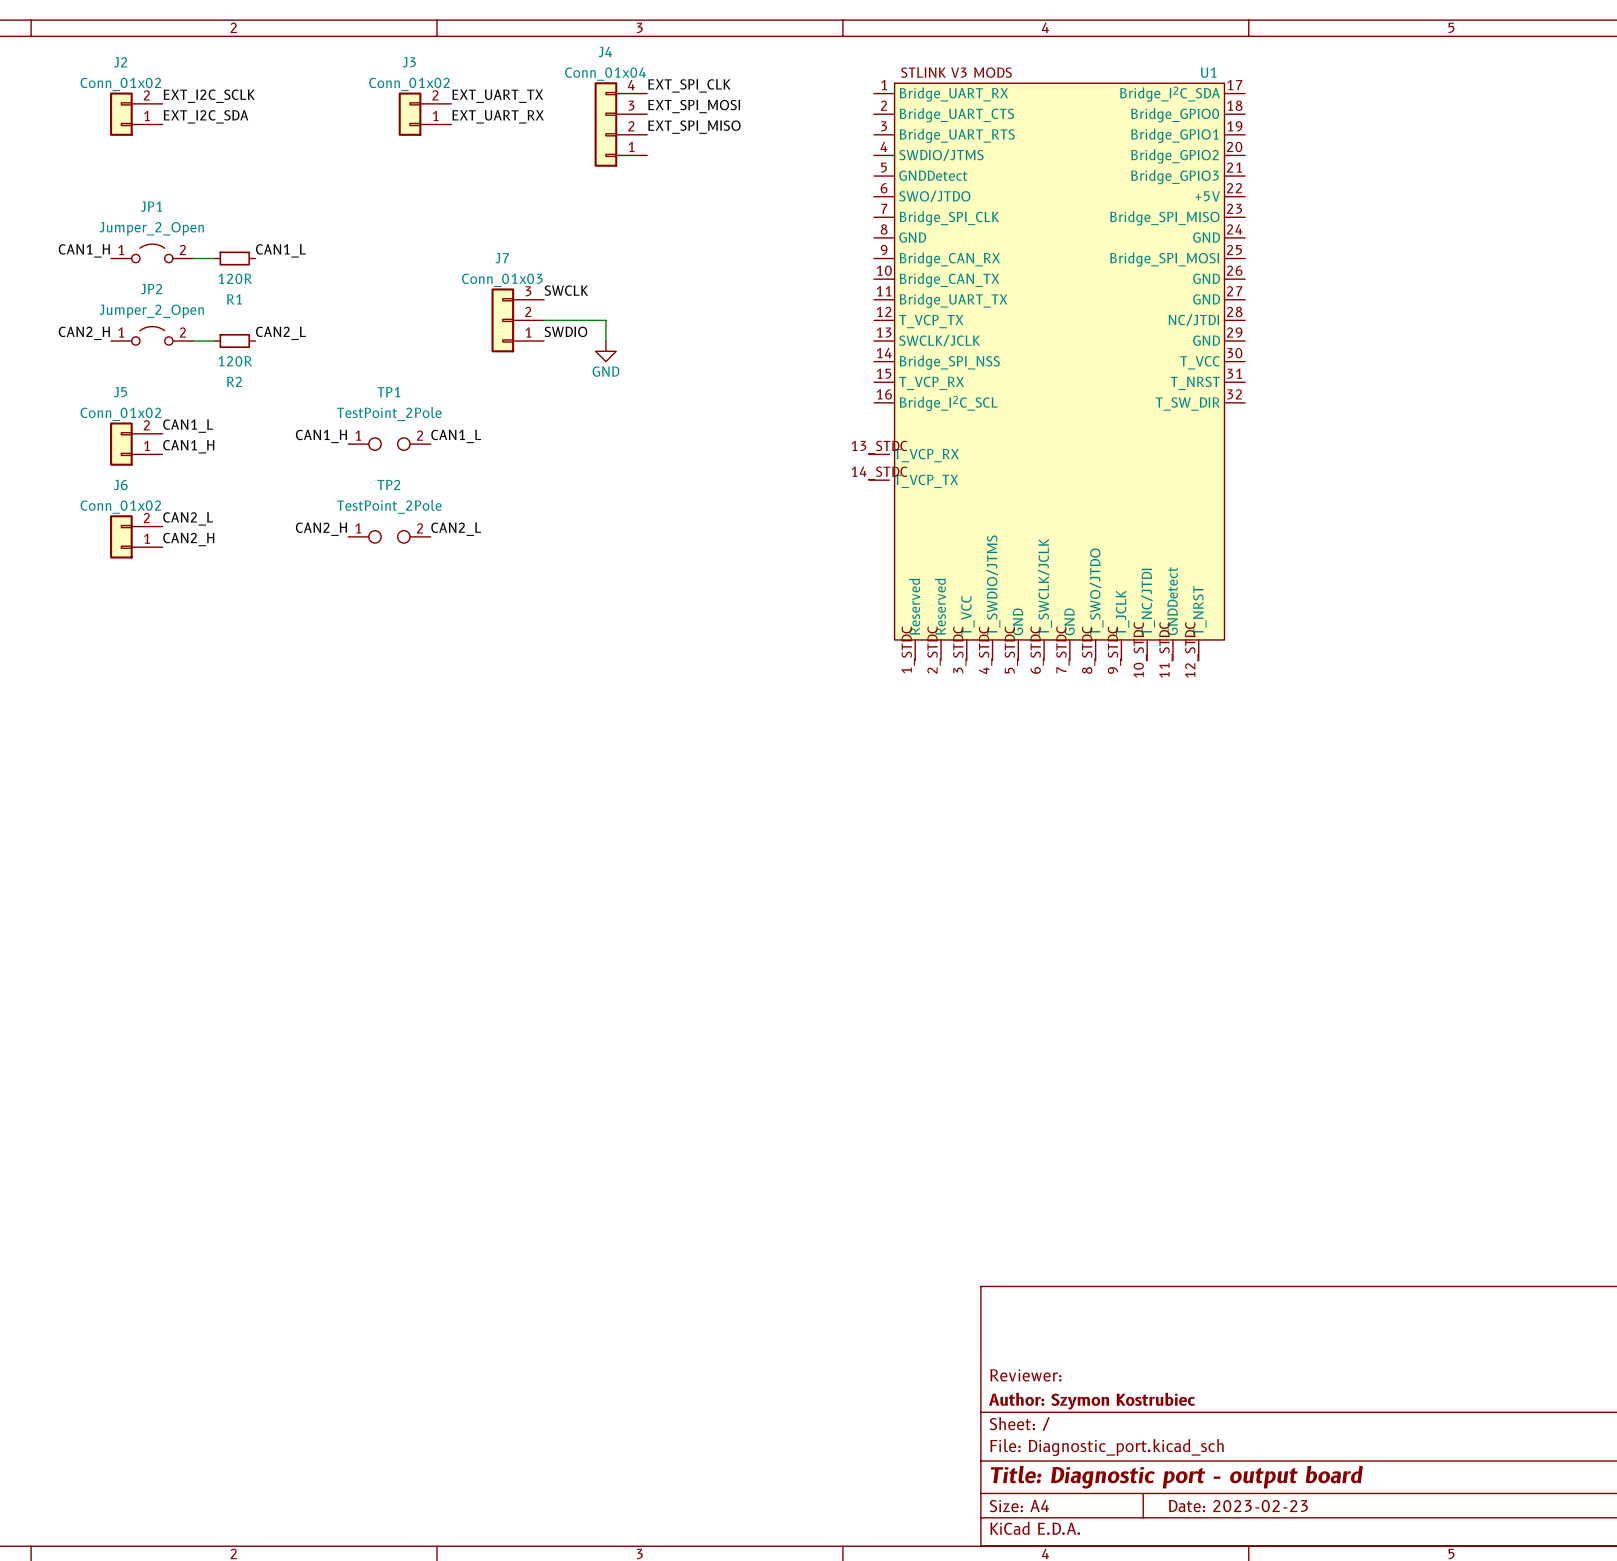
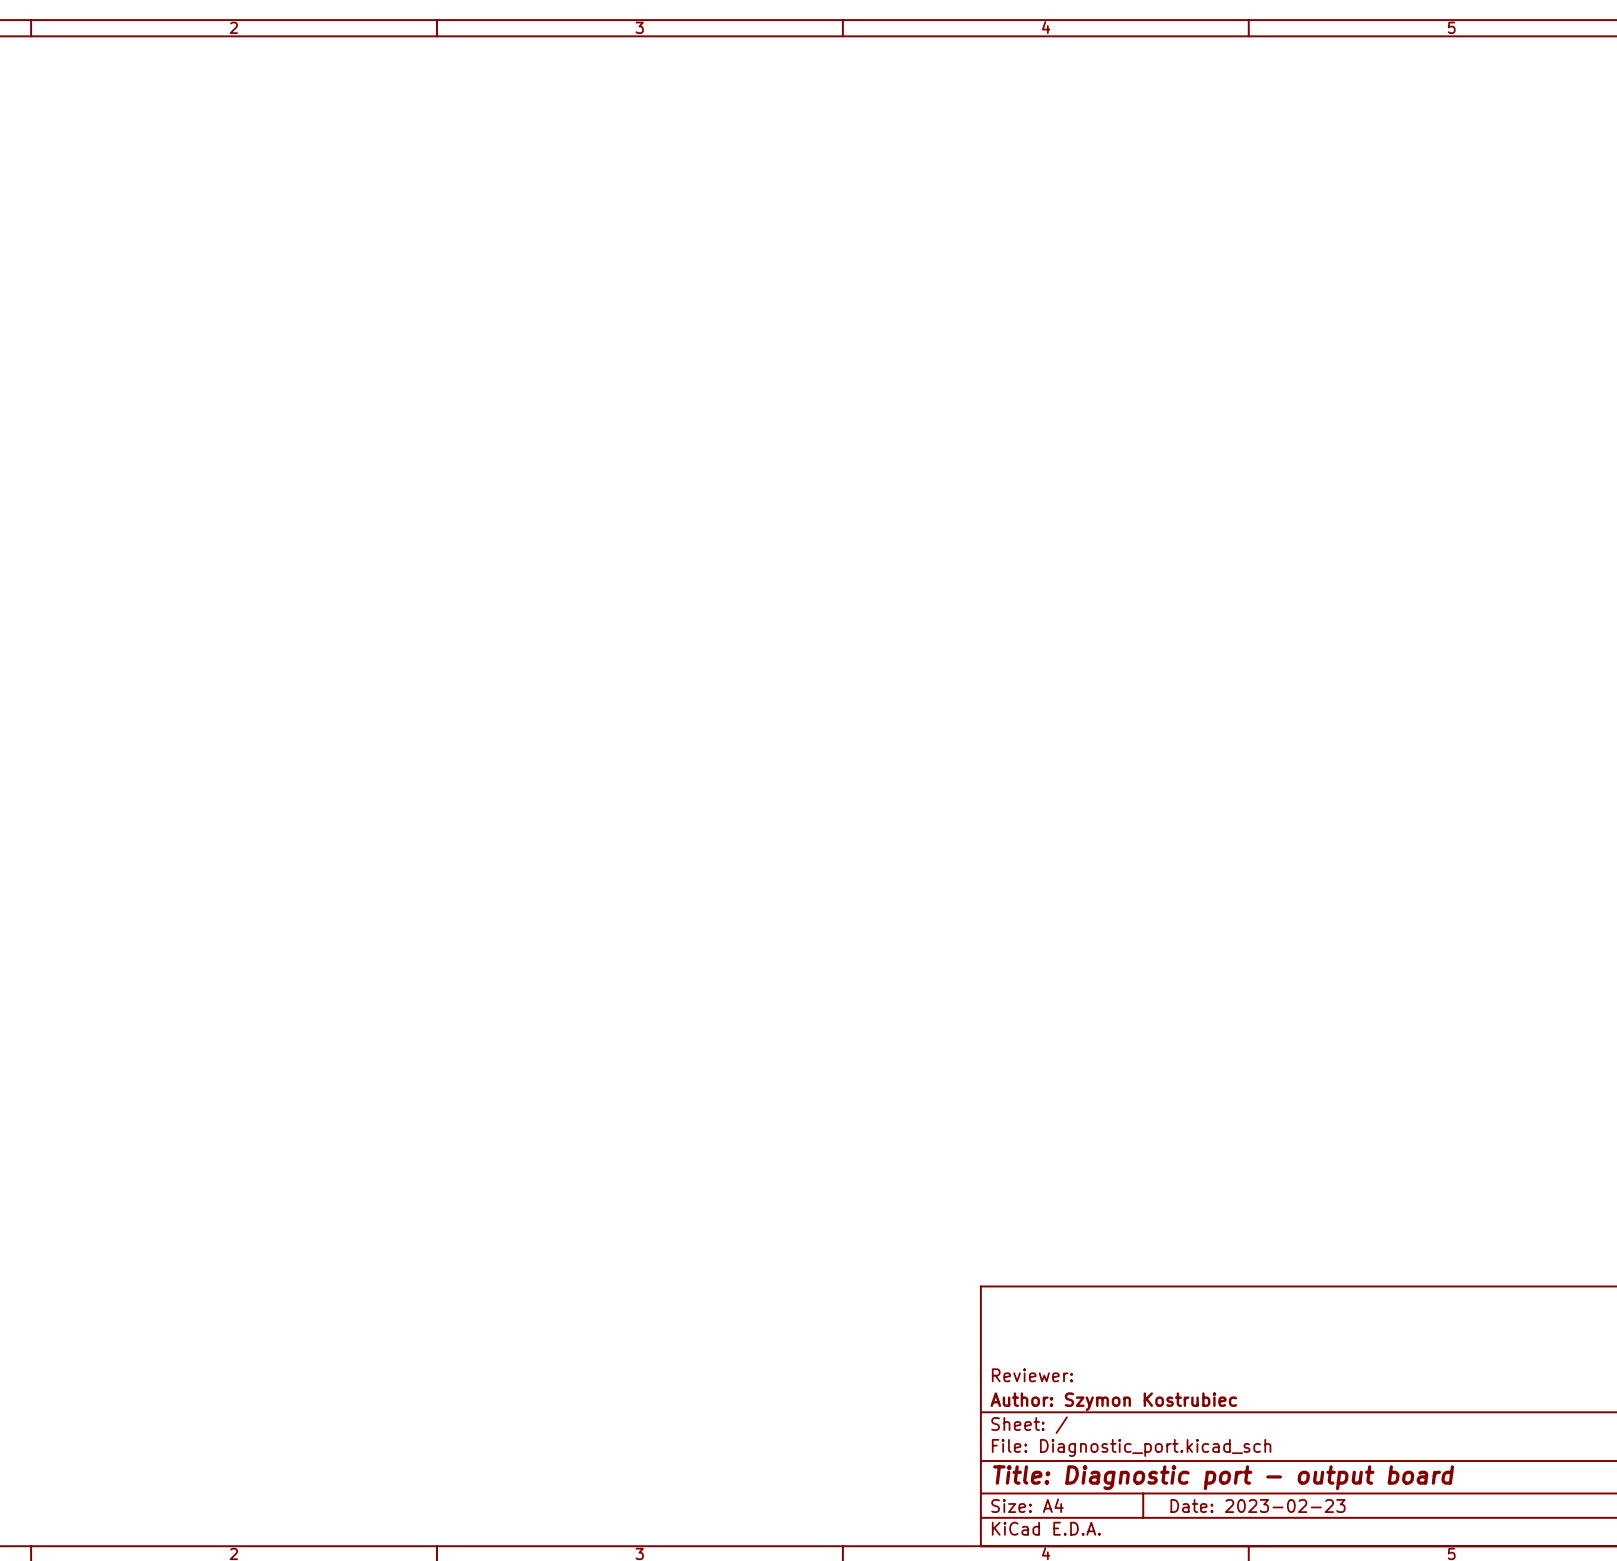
label: EXT_SPI_CLK (689, 85) -> none
label: EXT_I2C_SCLK (209, 96) -> none
label: EXT_UART_TX (497, 96) -> none
label: EXT_SPI_MOSI (694, 106) -> none
J2: Conn_01x02 (136, 114) -> none
J3: Conn_01x02 (424, 114) -> none
label: EXT_I2C_SDA (206, 116) -> none
label: EXT_UART_RX (498, 116) -> none
J4: Conn_01x04 (620, 124) -> none
label: EXT_SPI_MISO (694, 127) -> none
label: CAN1_H (84, 250) -> none
label: CAN1_L (280, 250) -> none
JP1: Jumper_2_Open (152, 253) -> none
wire: (193, 258) (214, 258) -> none
R1: 120R (234, 258) -> none
label: SWCLK (566, 290) -> none
J7: Conn_01x03 (517, 320) -> none
wire: (544, 320) (605, 320) (605, 341) -> none
label: SWDIO (565, 331) -> none
label: CAN2_H (84, 333) -> none
label: CAN2_L (280, 333) -> none
JP2: Jumper_2_Open (152, 335) -> none
wire: (193, 341) (214, 341) -> none
R2: 120R (234, 341) -> none
power symbol: GND (605, 351) -> none
U1: (1056, 371) -> none
label: CAN1_L (188, 426) -> none
label: CAN1_H (321, 436) -> none
label: CAN1_L (456, 436) -> none
J5: Conn_01x02 (136, 444) -> none
TP1: TestPoint_2Pole (389, 444) -> none
label: CAN1_H (188, 446) -> none
label: CAN2_L (188, 518) -> none
label: CAN2_H (321, 529) -> none
label: CAN2_L (456, 529) -> none
J6: Conn_01x02 (136, 536) -> none
TP2: TestPoint_2Pole (389, 536) -> none
label: CAN2_H (188, 539) -> none

